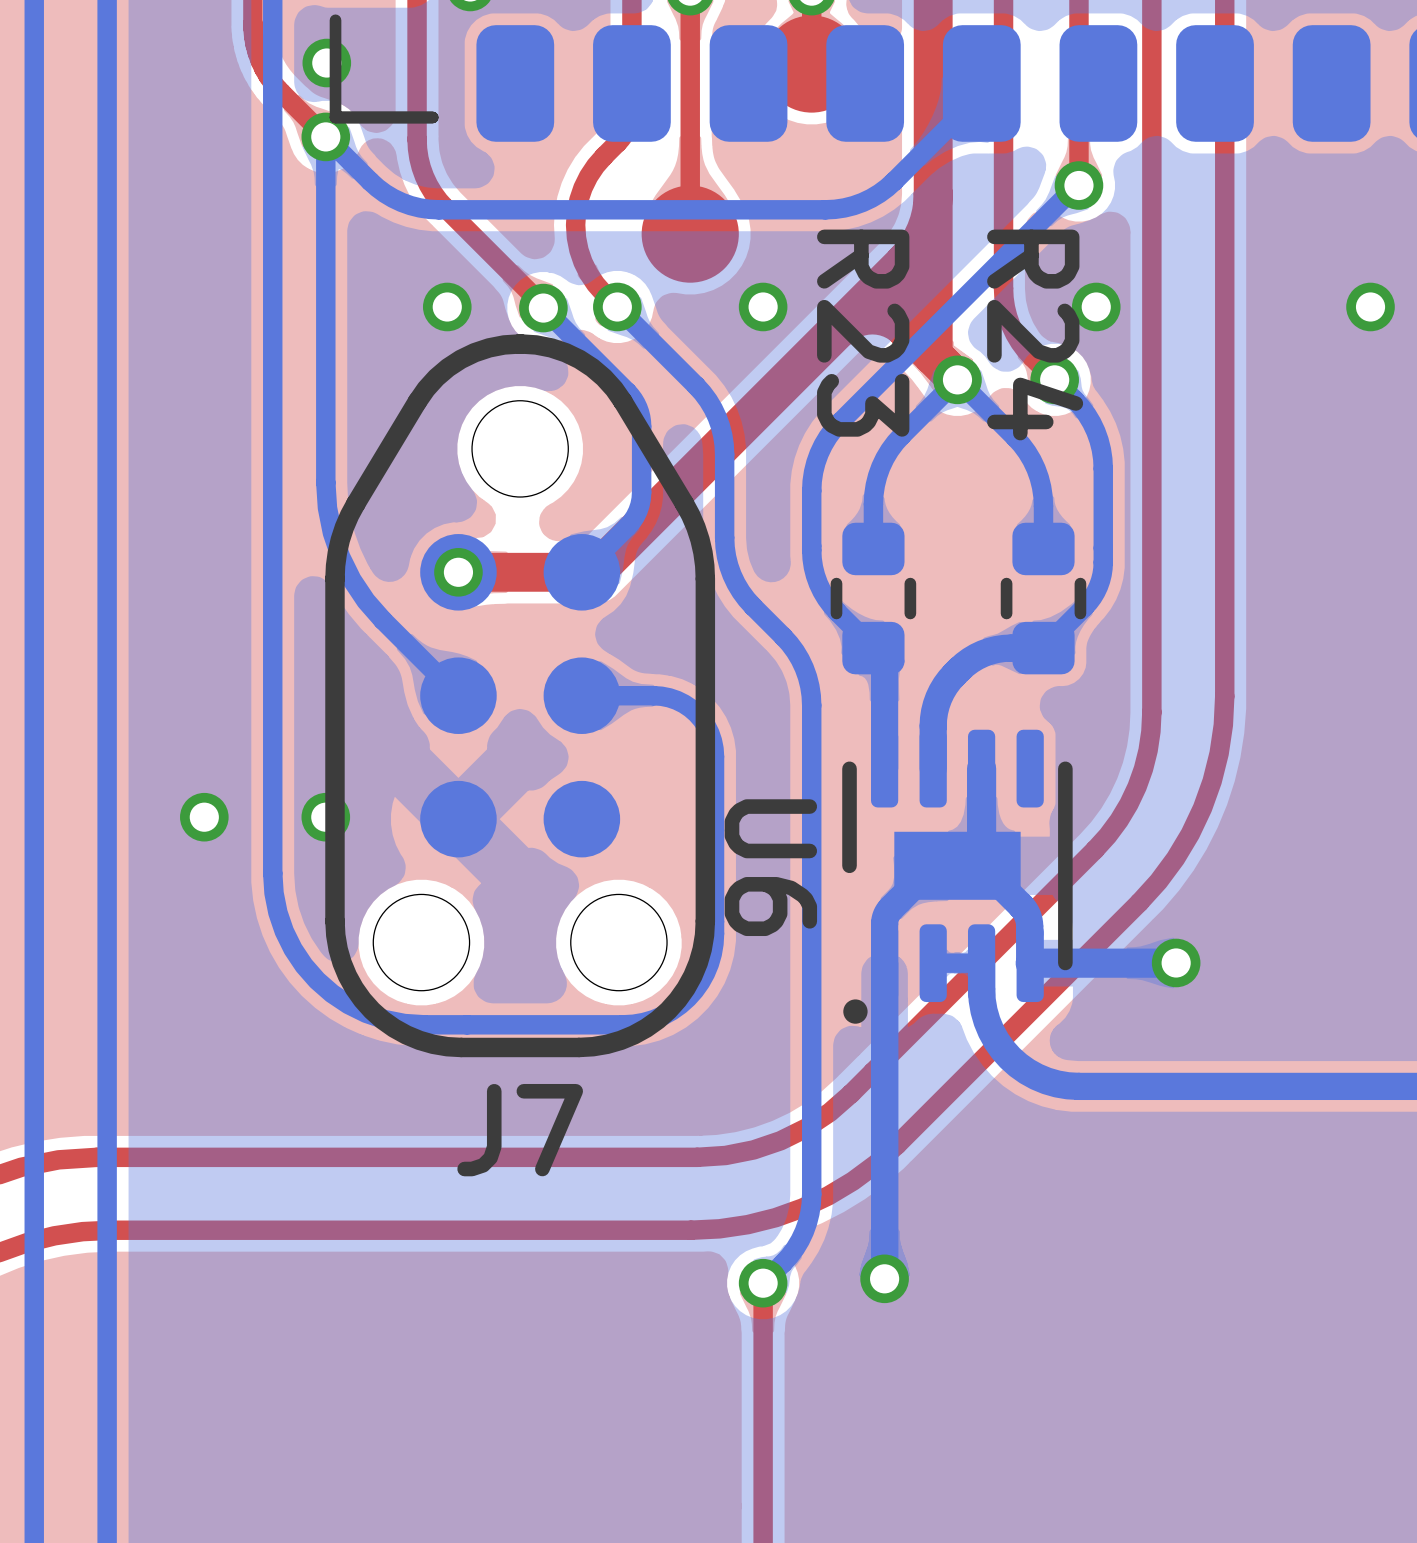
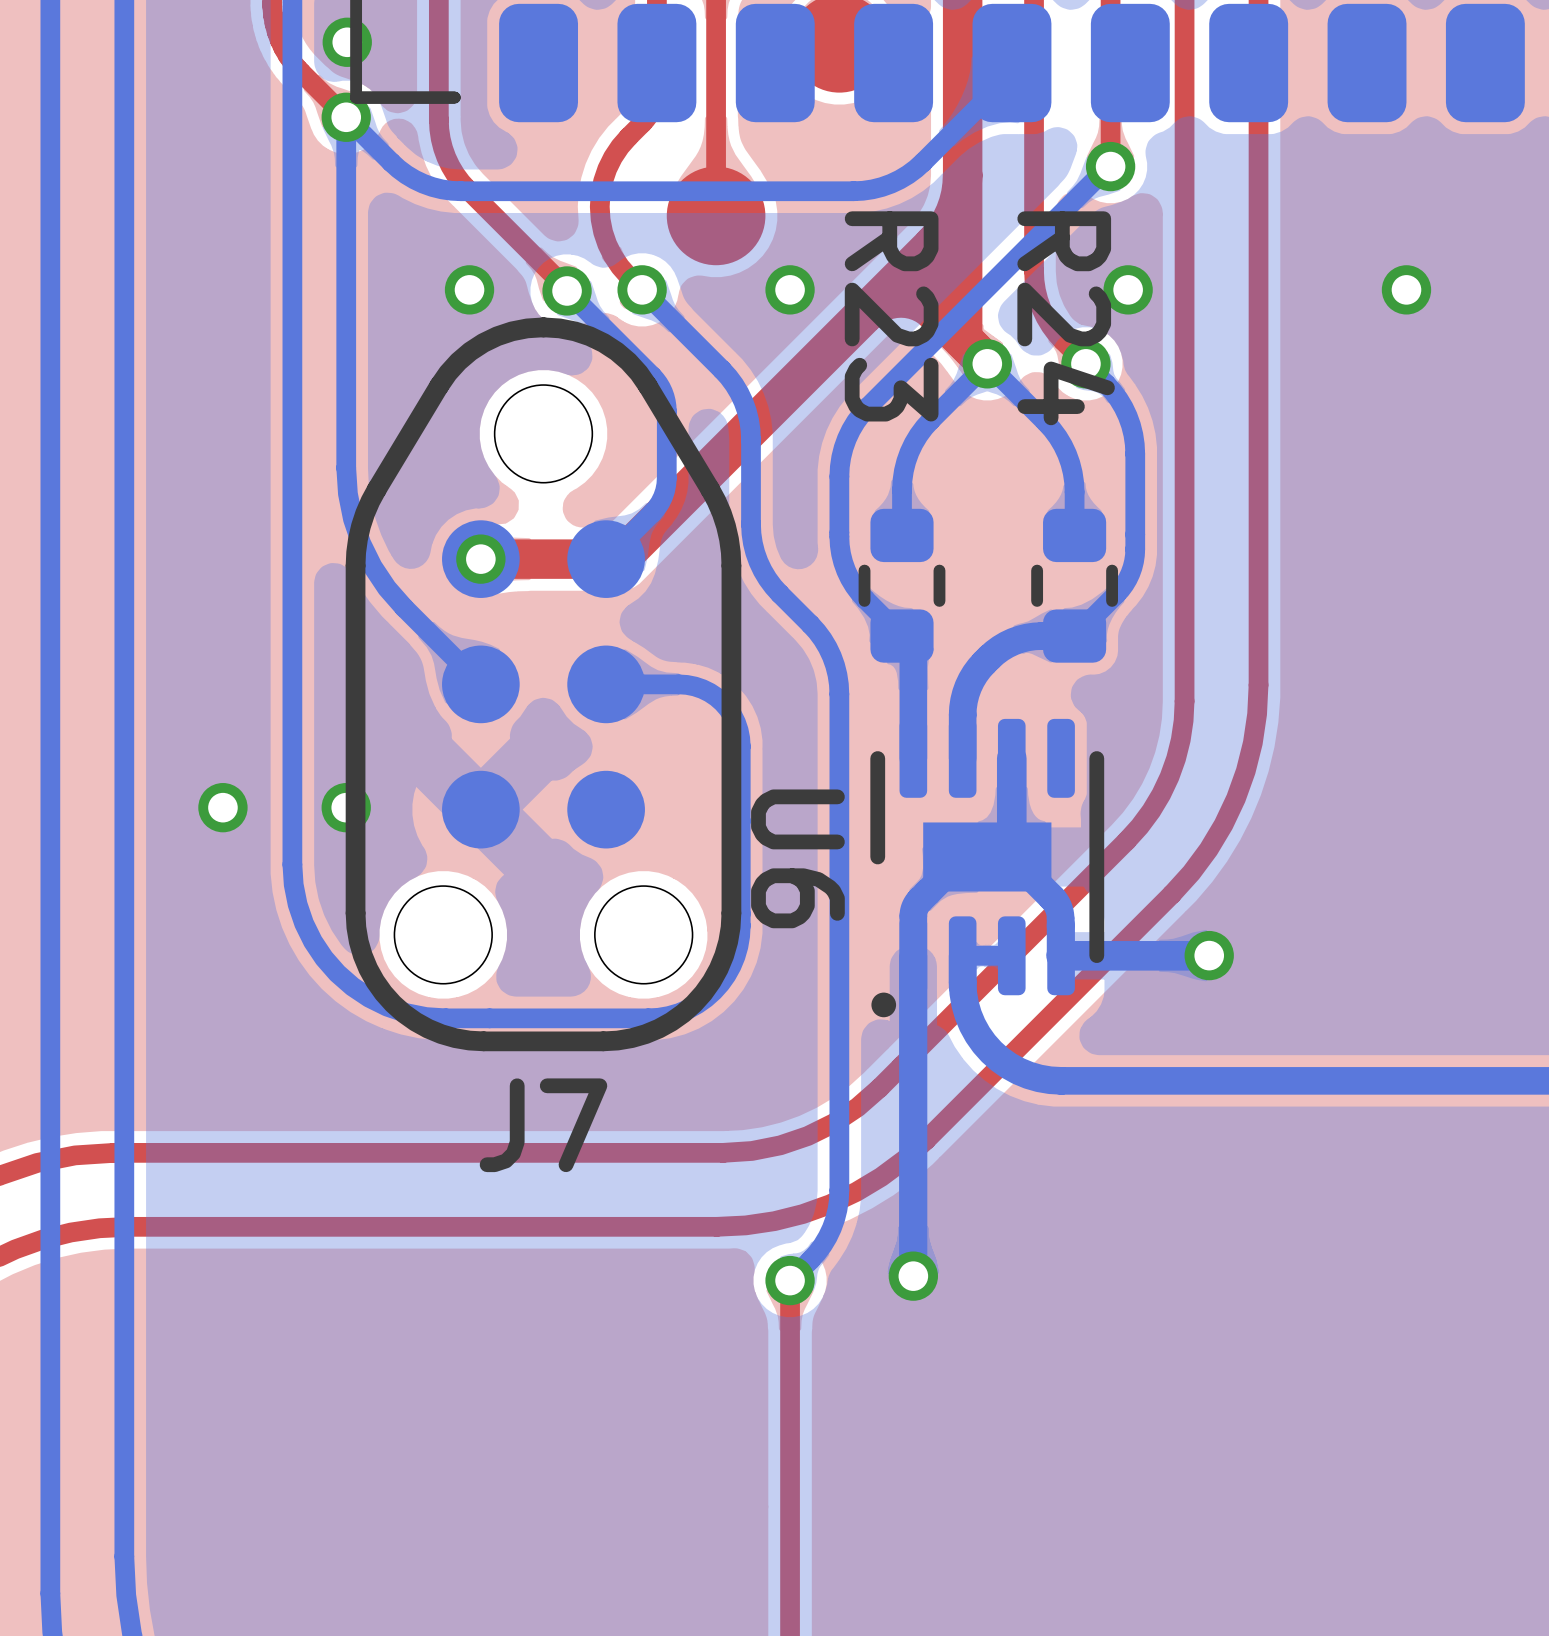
bottom track: (981, 963) (984, 1010) (991, 1031) (1002, 1049) (1018, 1065) (1036, 1076) (1057, 1083) (1078, 1086) -> (962, 955) (963, 993) (968, 1014) (977, 1034) (999, 1059) (1018, 1071) (1039, 1078) (1061, 1080) (1110, 1080)

